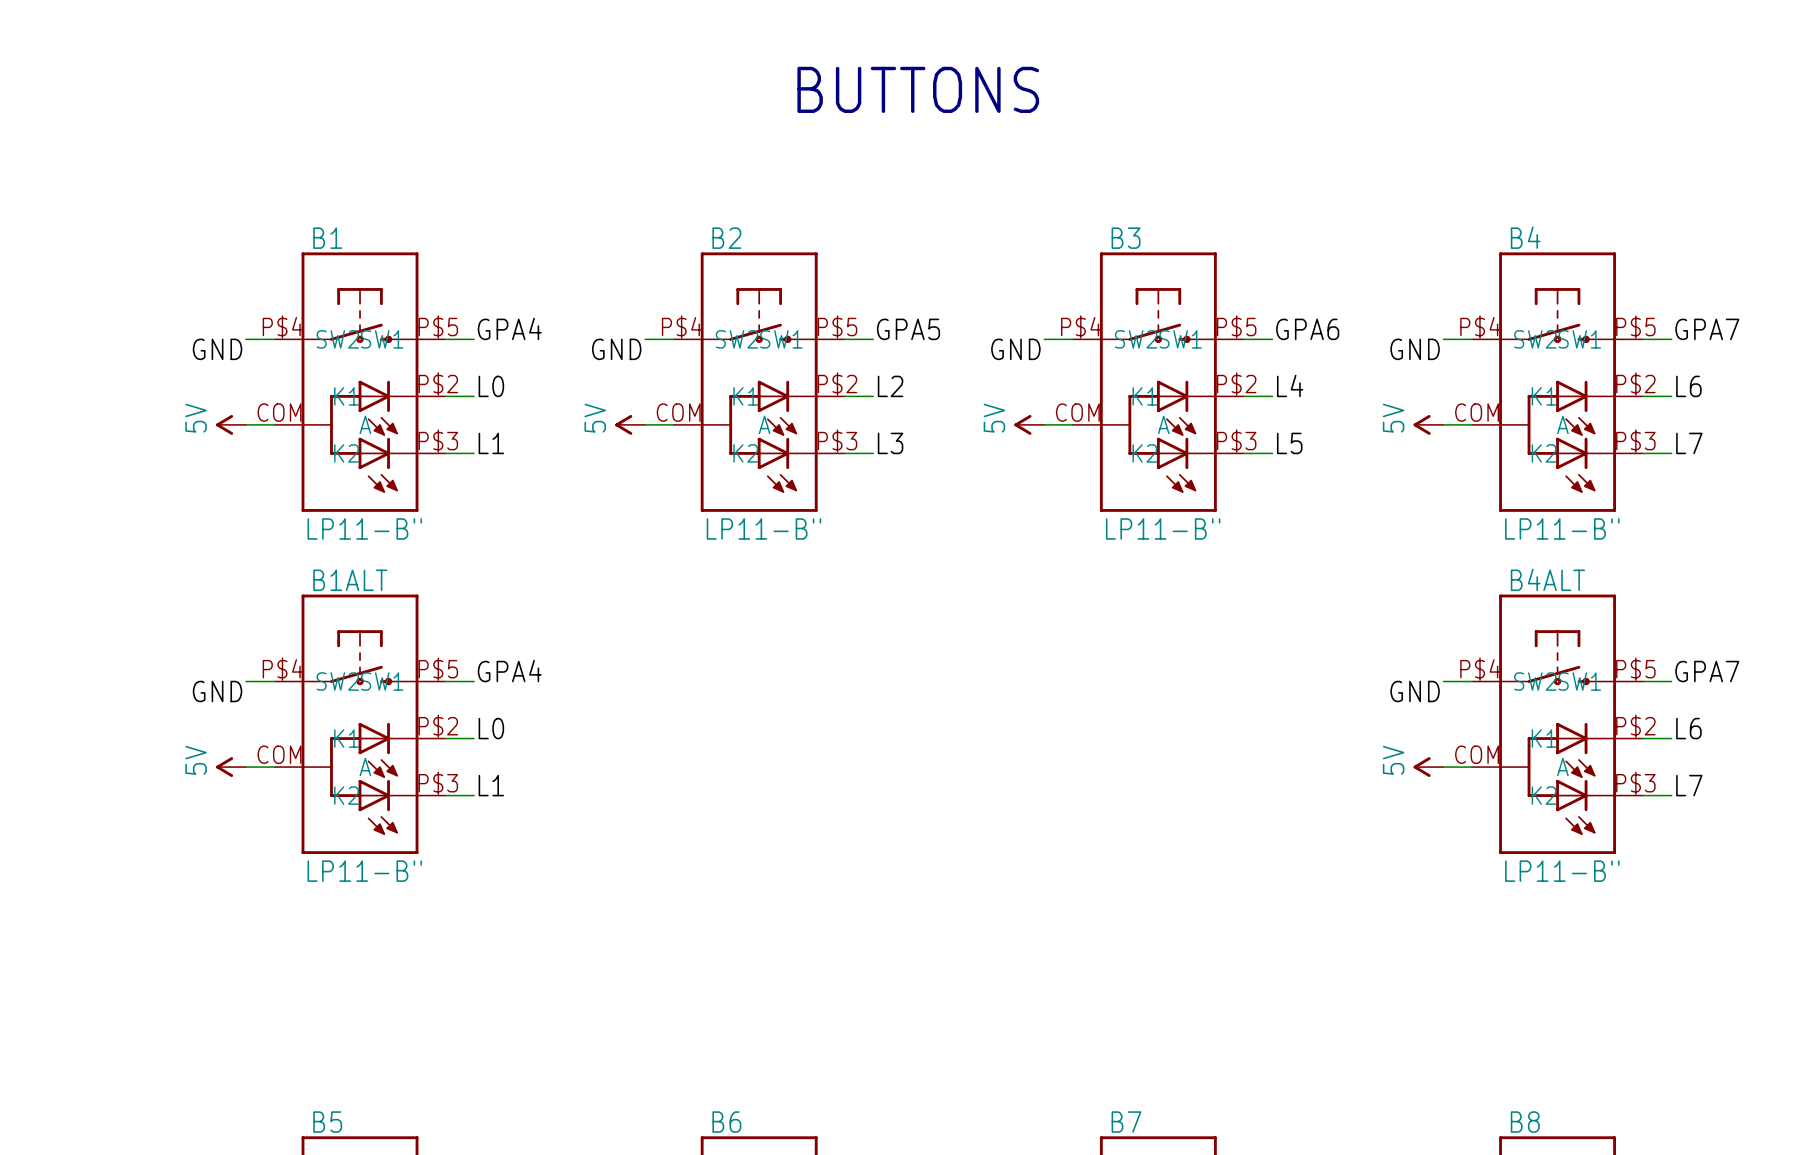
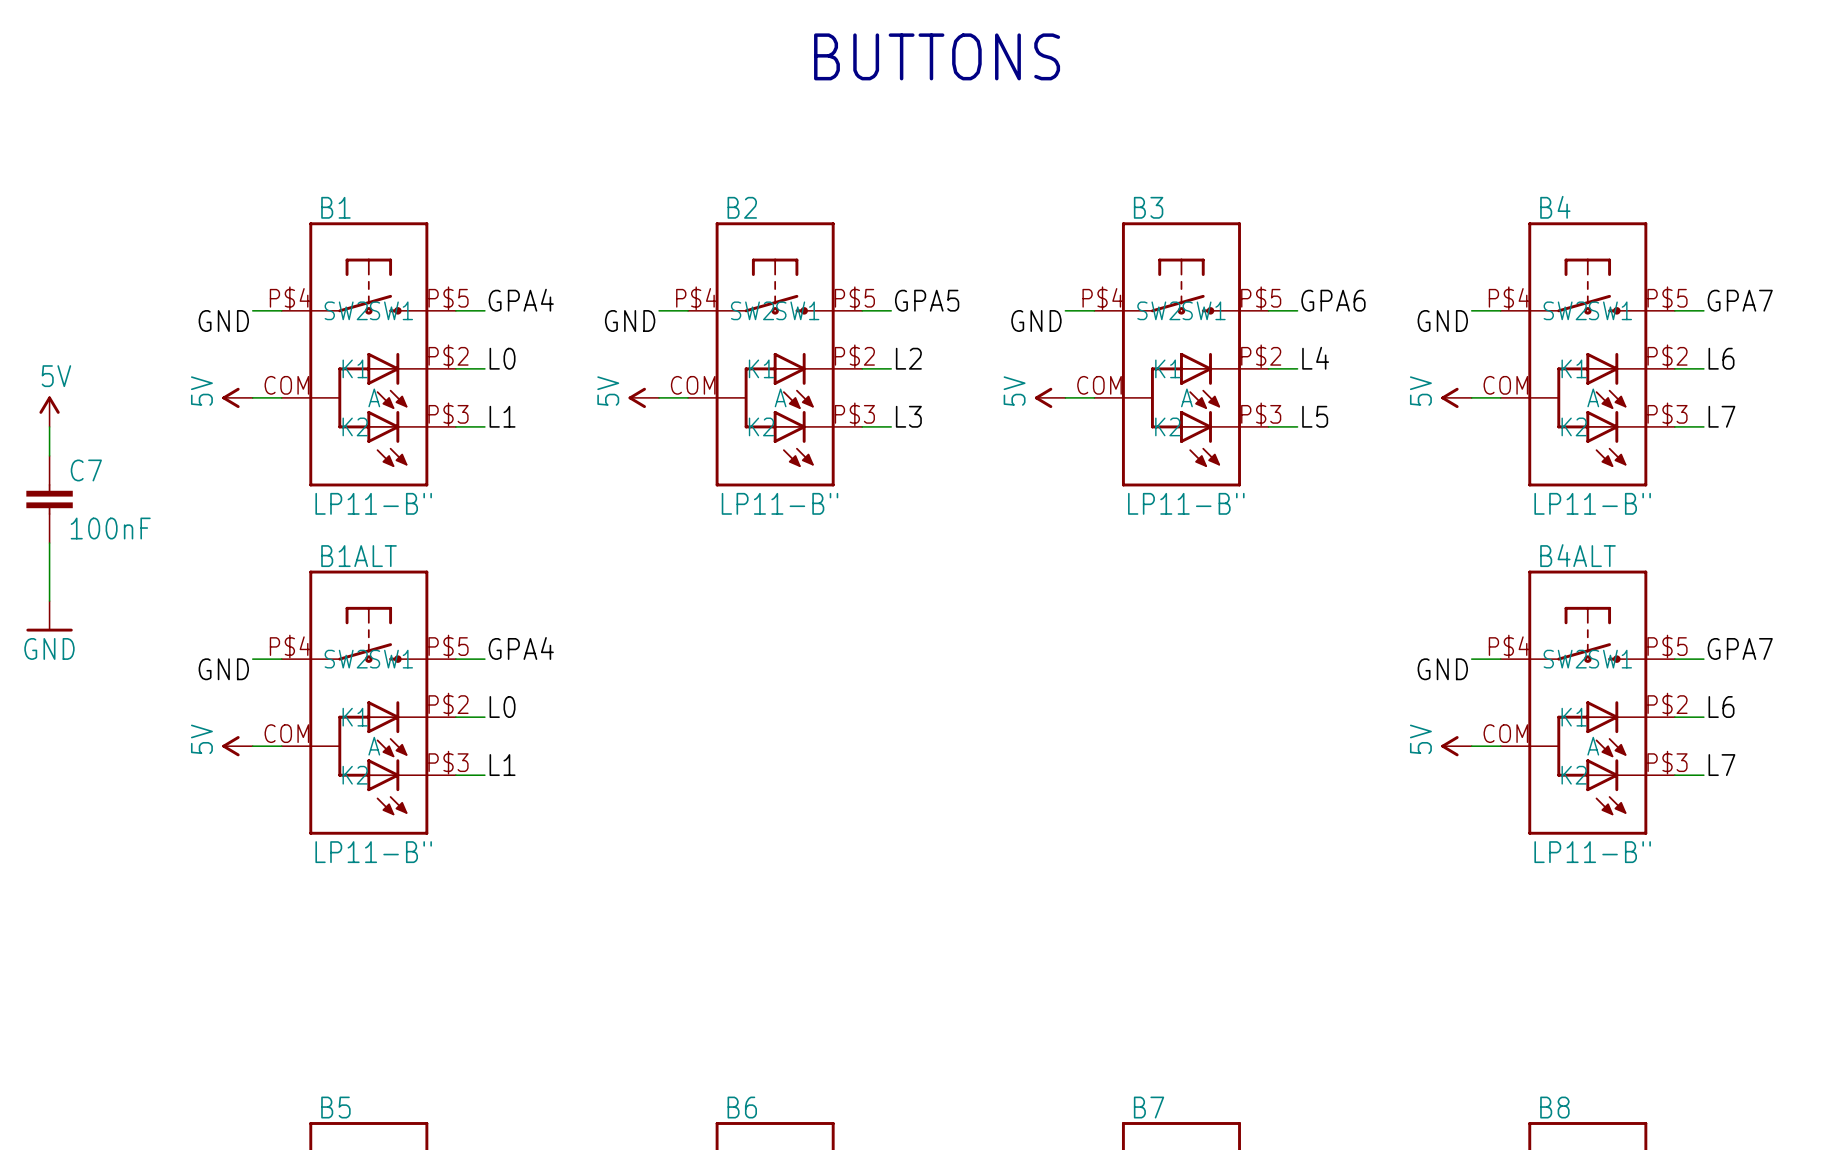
power symbol: none -> 5V (49, 411)
wire: none -> (49, 426) (49, 455)
C7: none -> 100nF (49, 499)
wire: none -> (49, 543) (49, 601)
power symbol: none -> GND (49, 616)

